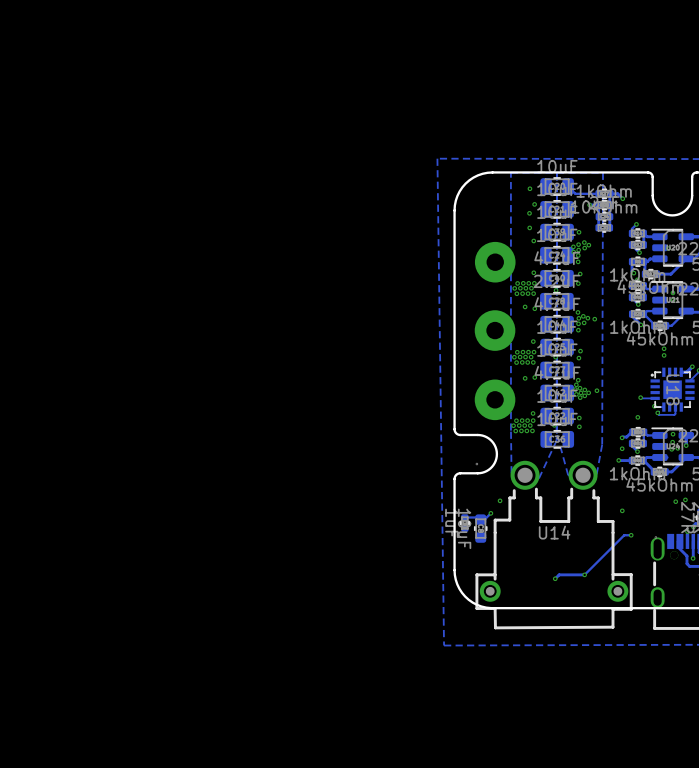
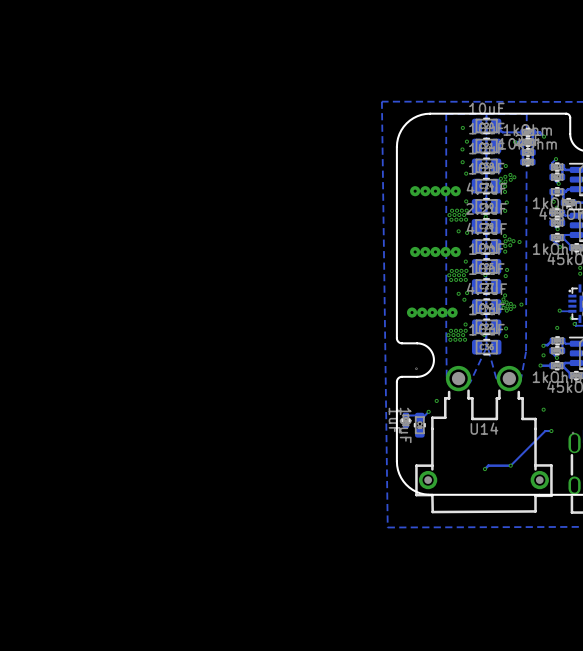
part footprint: [474, 241, 516, 283] -> [410, 186, 461, 197]
part footprint: [474, 310, 516, 351] -> [410, 246, 461, 258]
part footprint: [474, 379, 516, 421] -> [406, 307, 458, 318]
via: none -> (464, 299)

